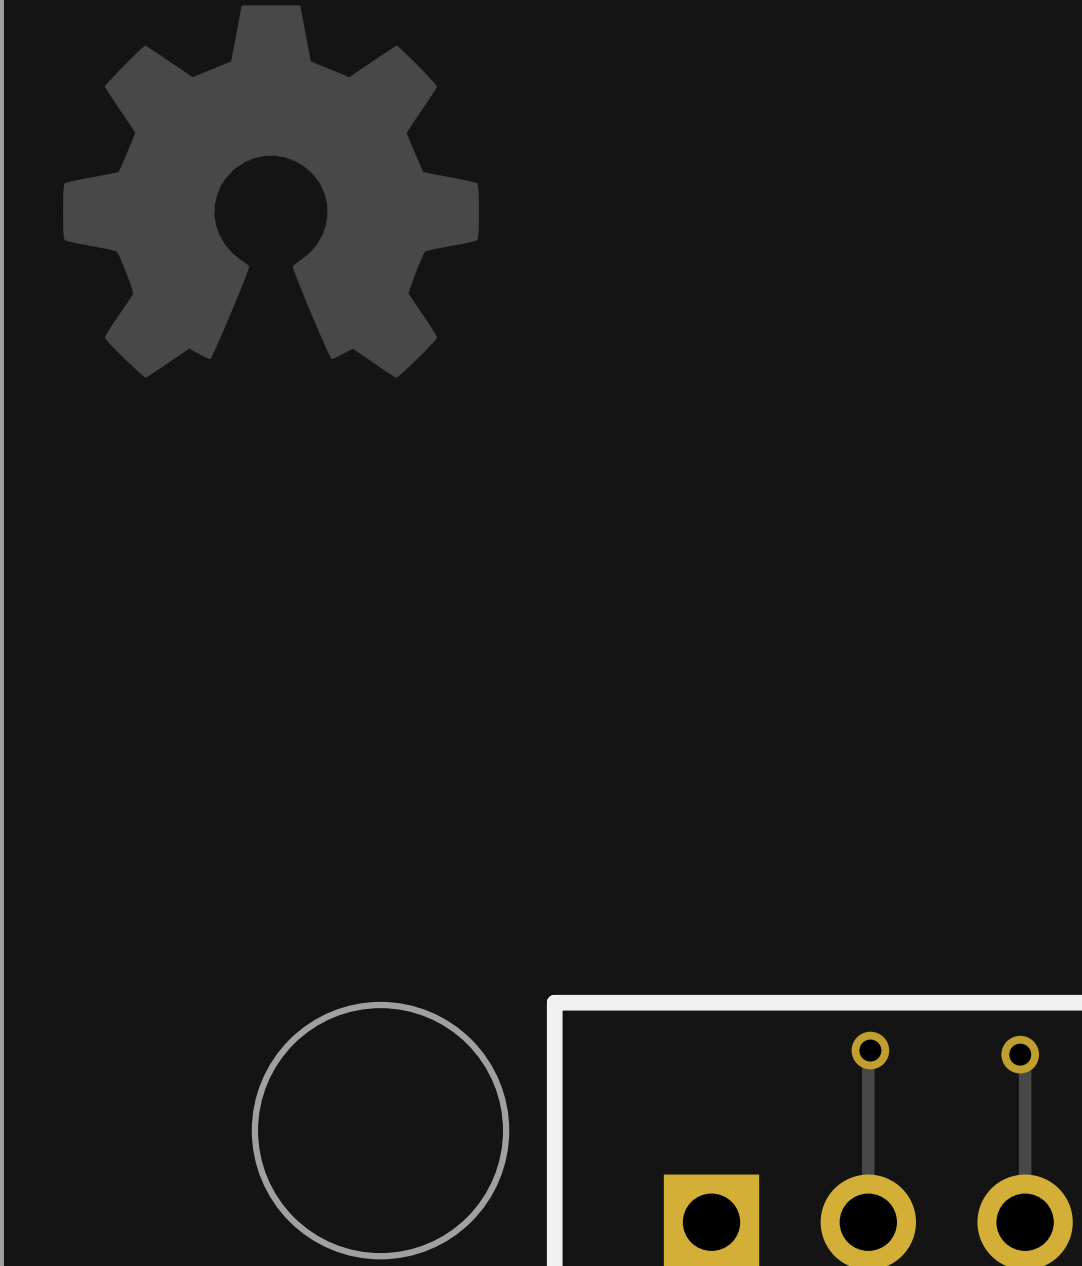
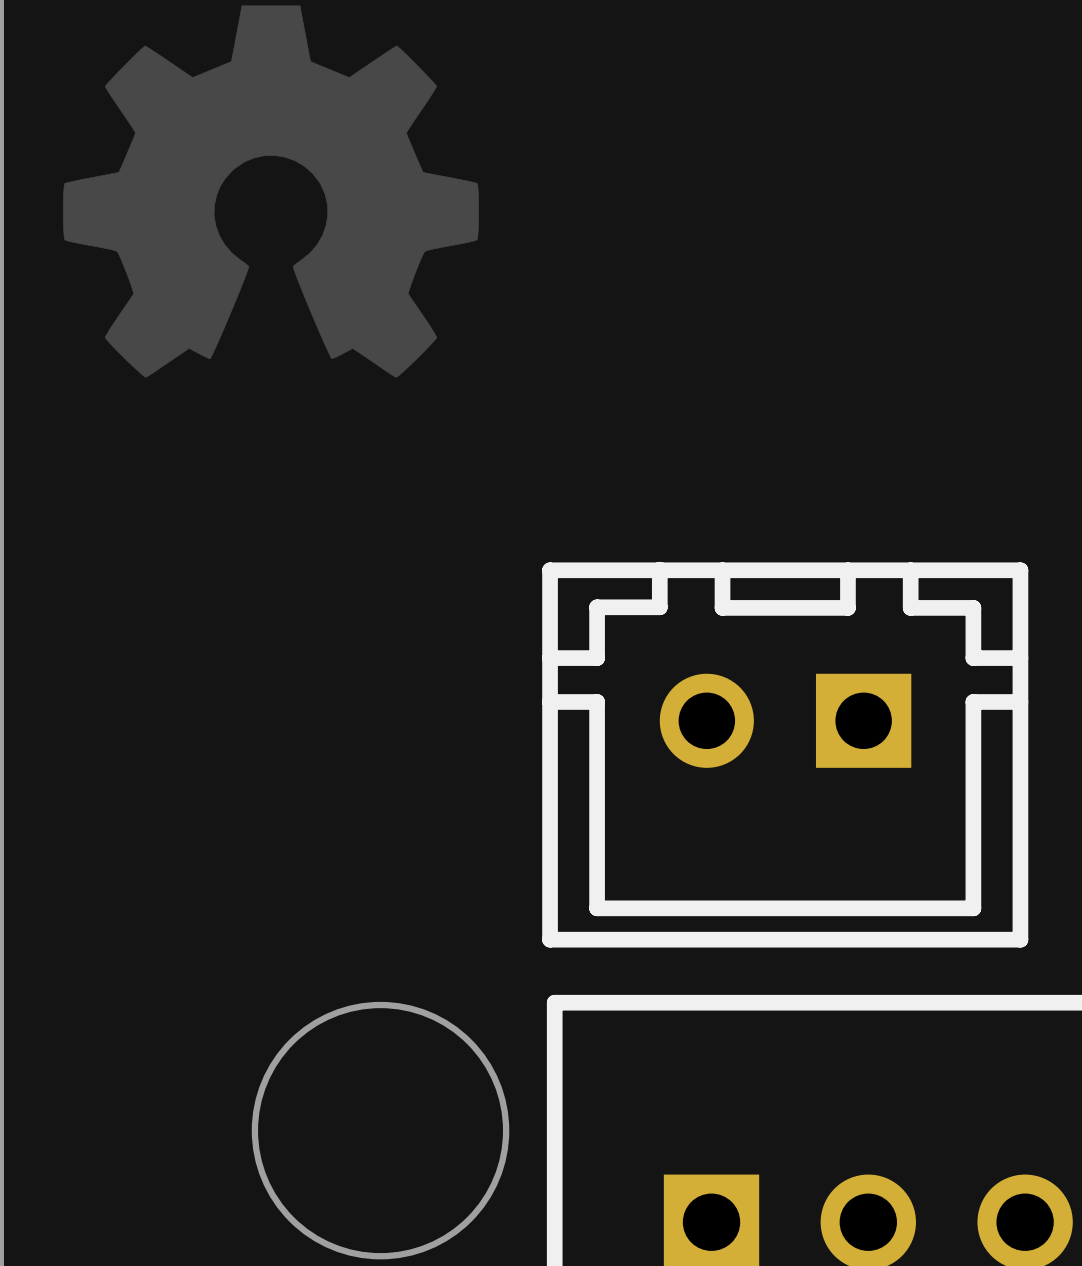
part: none -> (785, 754)
track: (870, 1050) (868, 1052) (868, 1222) -> none
via: (870, 1050) -> none
track: (1020, 1054) (1025, 1059) (1025, 1222) -> none
via: (1020, 1054) -> none

